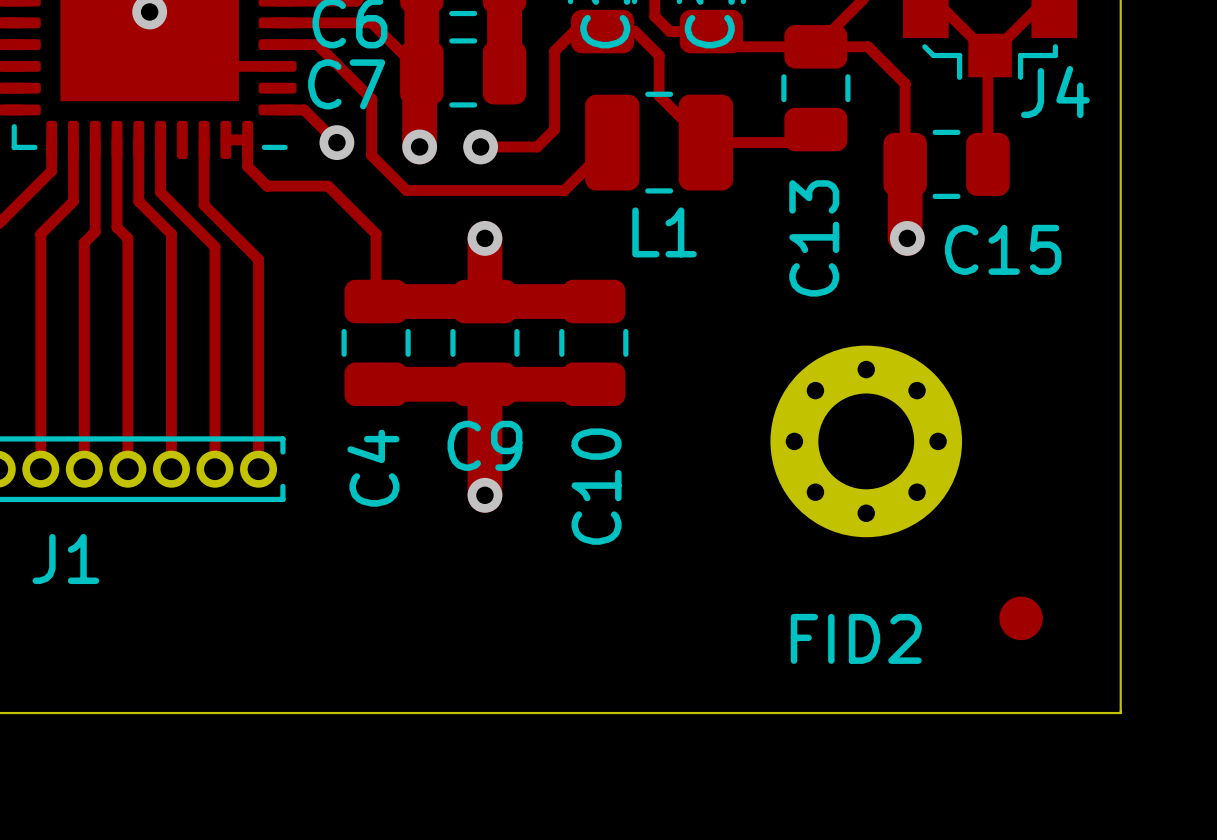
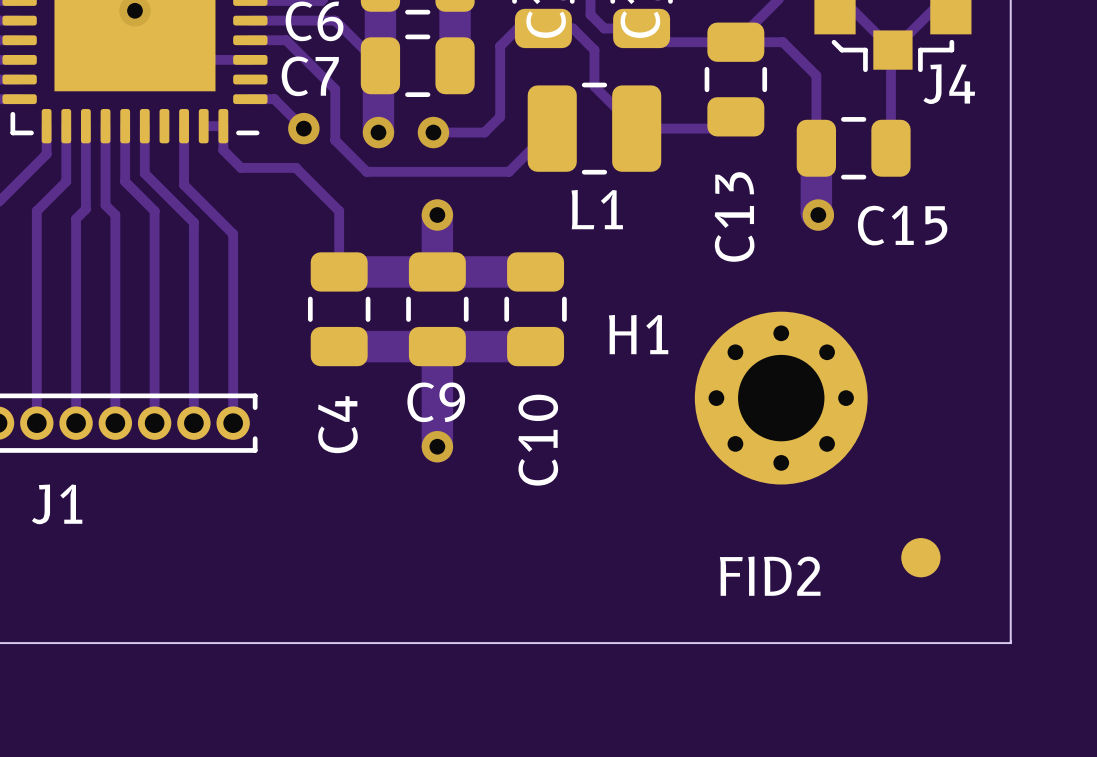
H1 name: none -> H1 (638, 334)

